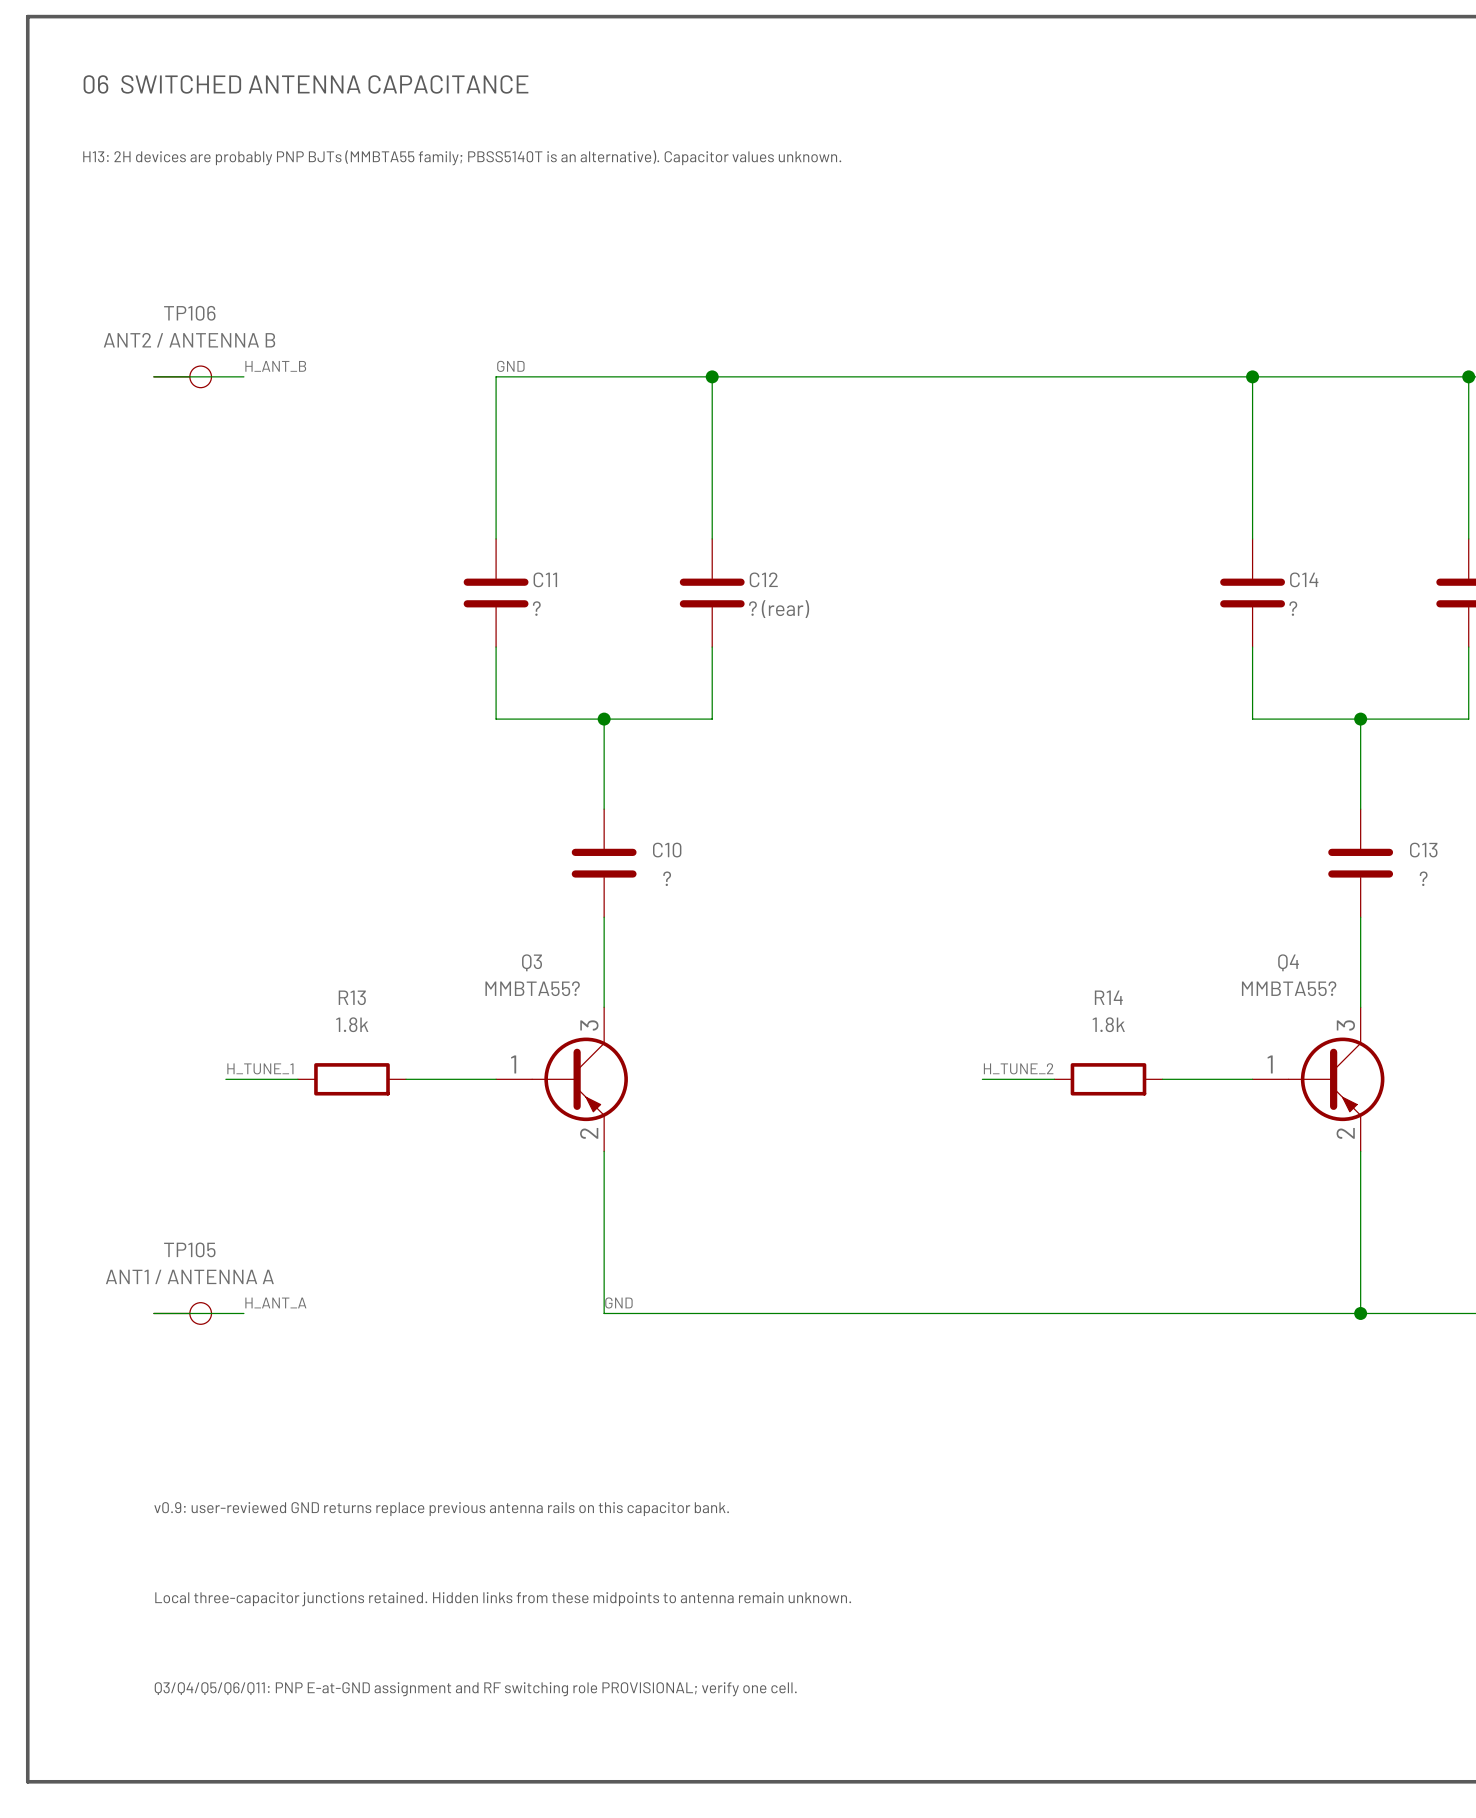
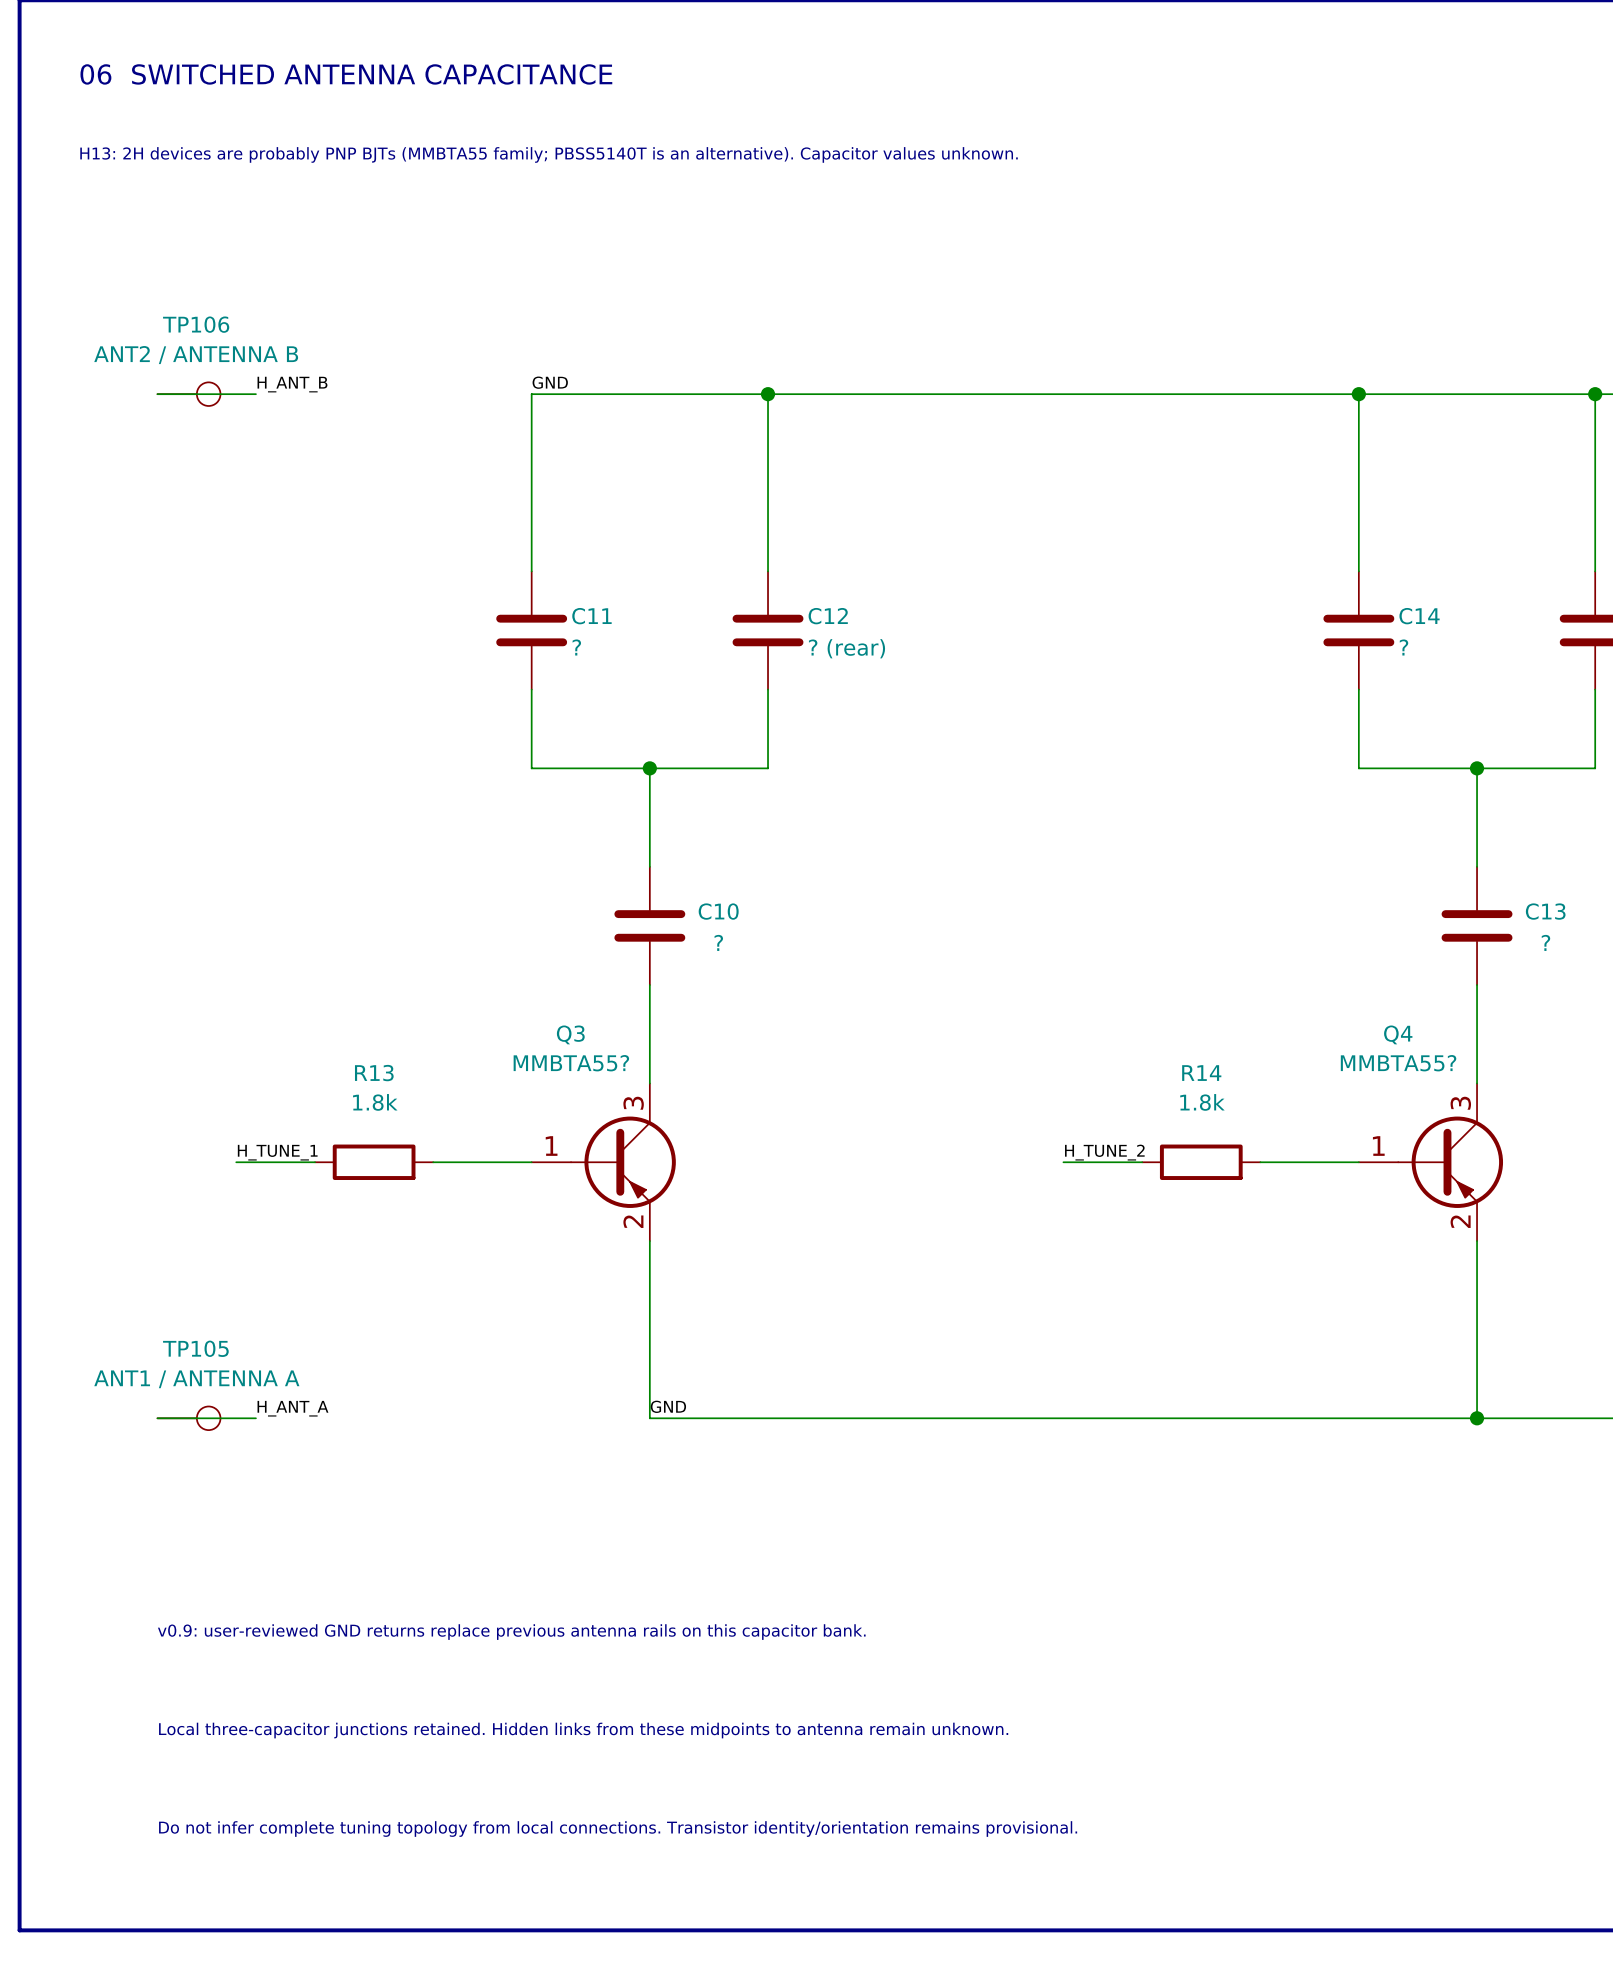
text: Q3/Q4/Q5/Q6/Q11: PNP E-at-GND assignment and RF switching role PROVISIONAL; verify one cell. (475, 1689) -> Do not infer complete tuning topology from local connections. Transistor identity/orientation remains provisional. (618, 1829)

